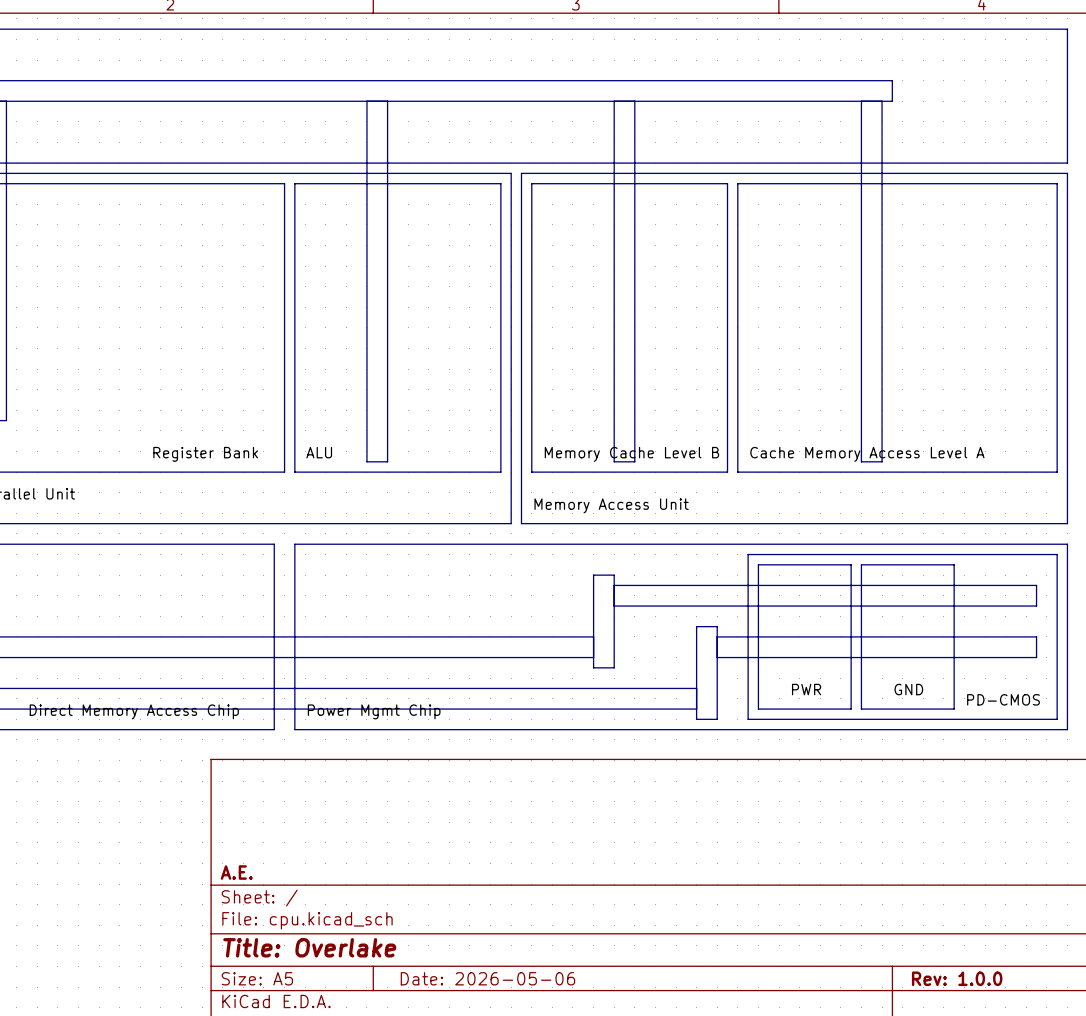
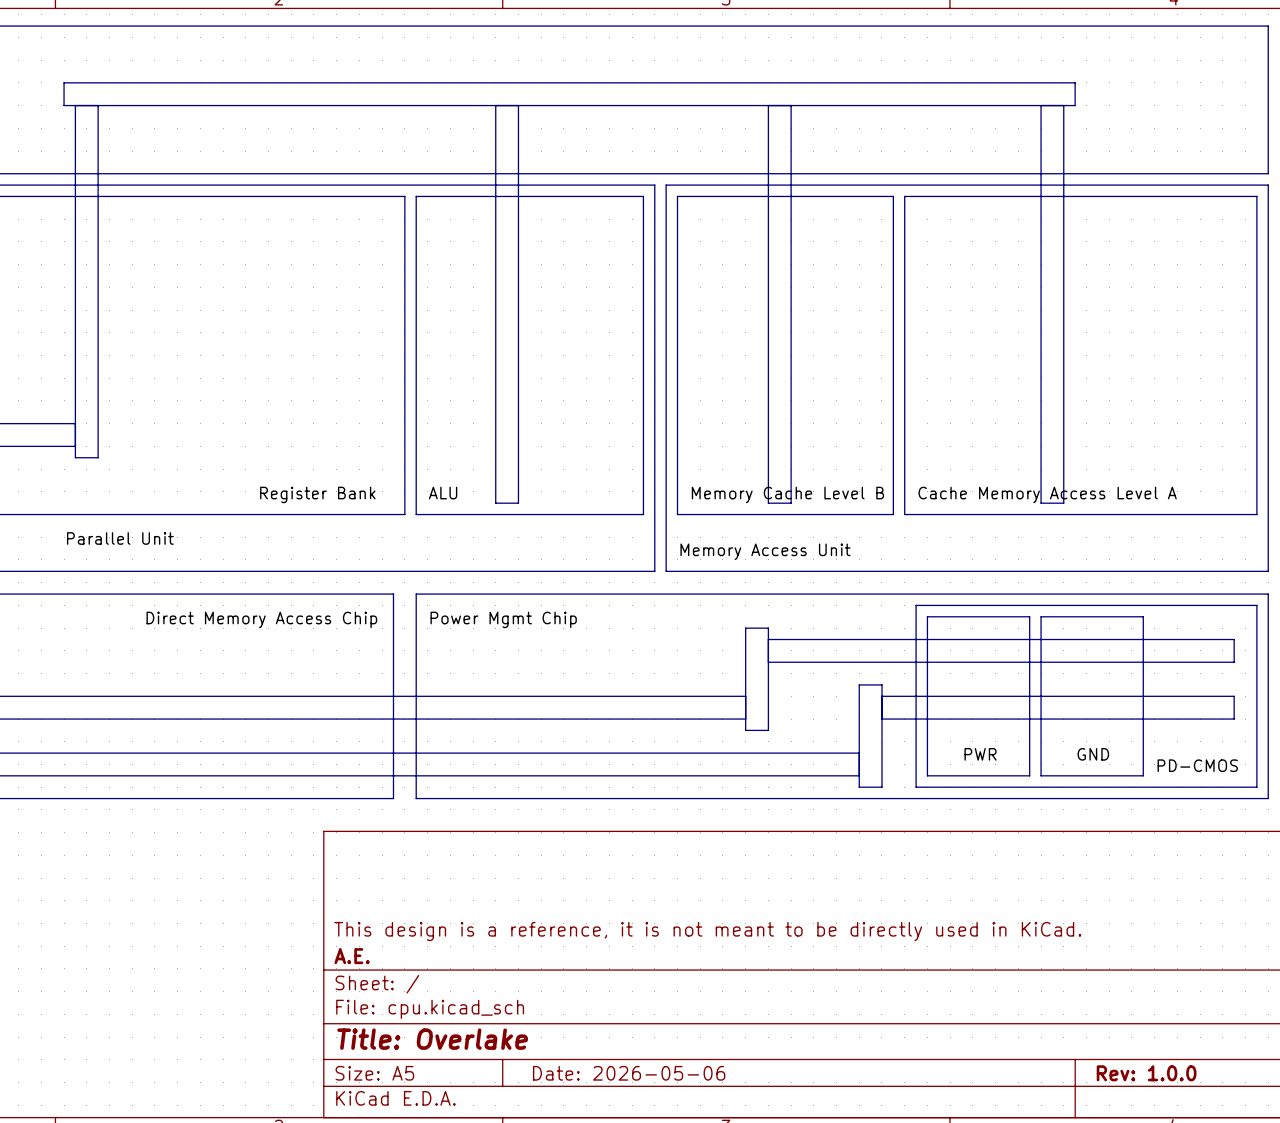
label position: Direct Memory Access Chip (134, 711) -> Direct Memory Access Chip (261, 619)
label position: Power Mgmt Chip (374, 711) -> Power Mgmt Chip (503, 619)
title block: none -> This design is a reference, it is not meant to be directly used in KiCad. (707, 931)

